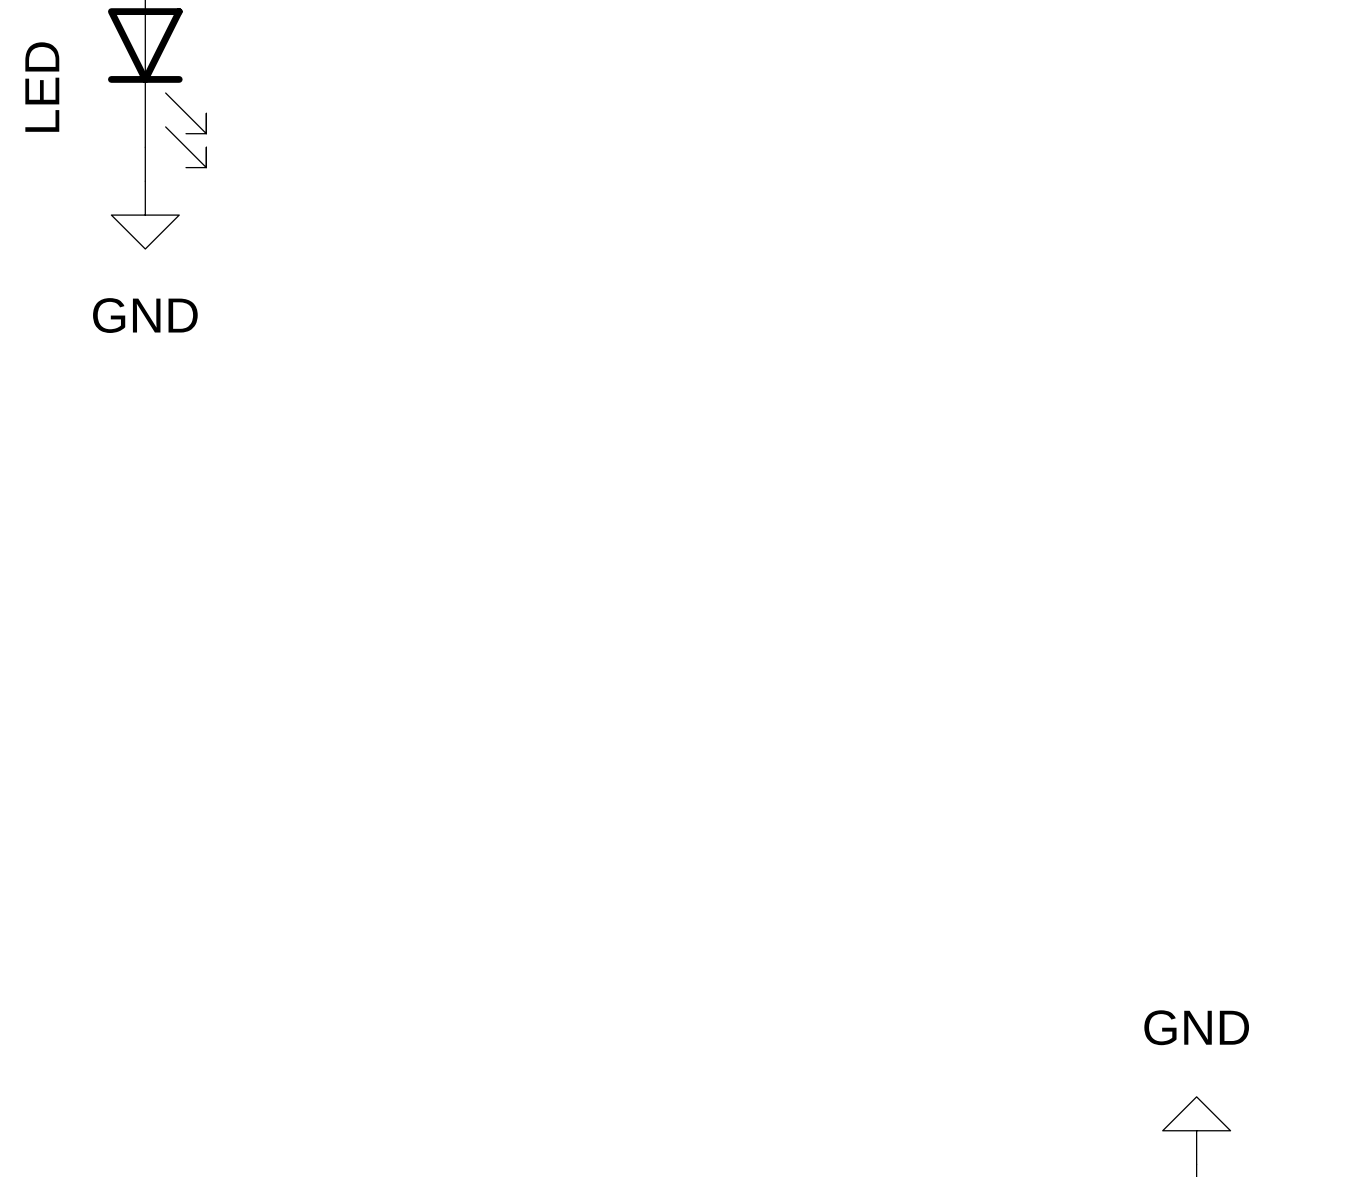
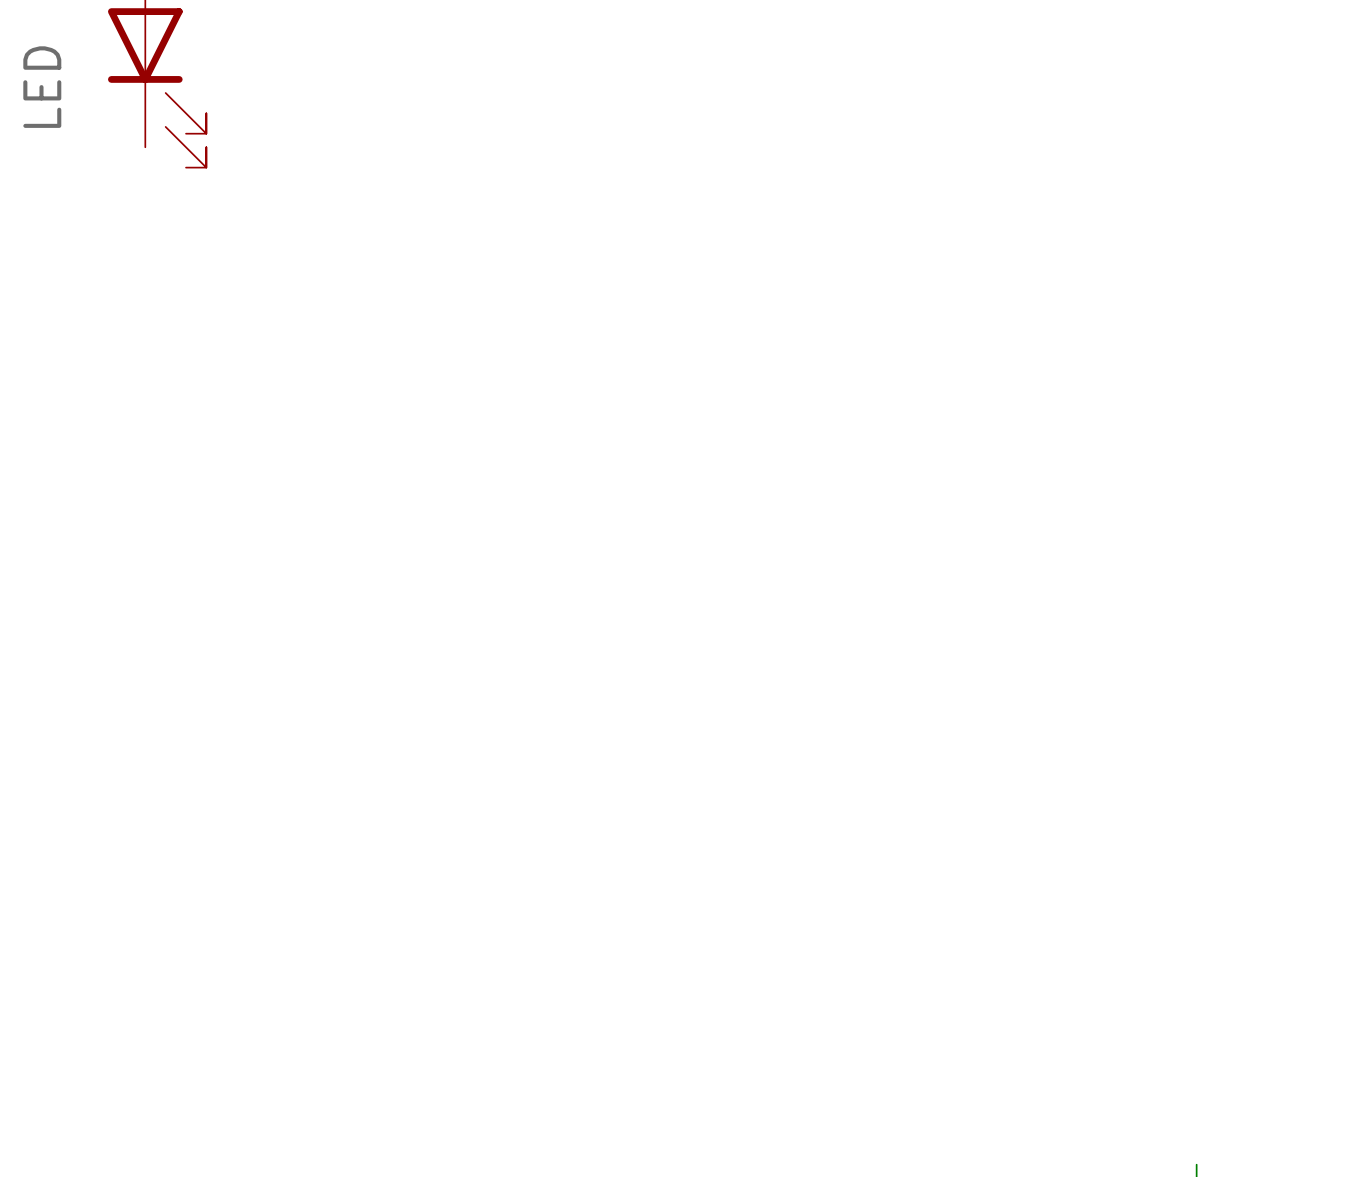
wire: (145, 147) (145, 181) -> none
power symbol: GND (145, 215) -> none
power symbol: GND (1196, 1130) -> none

